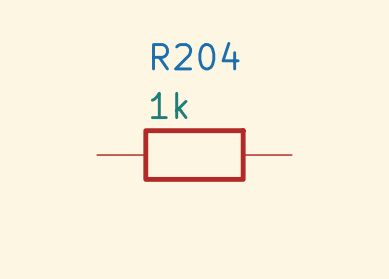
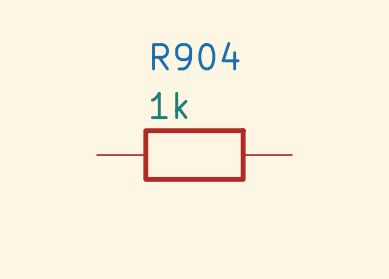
R204 name: R204 (195, 56) -> R904 (195, 56)

